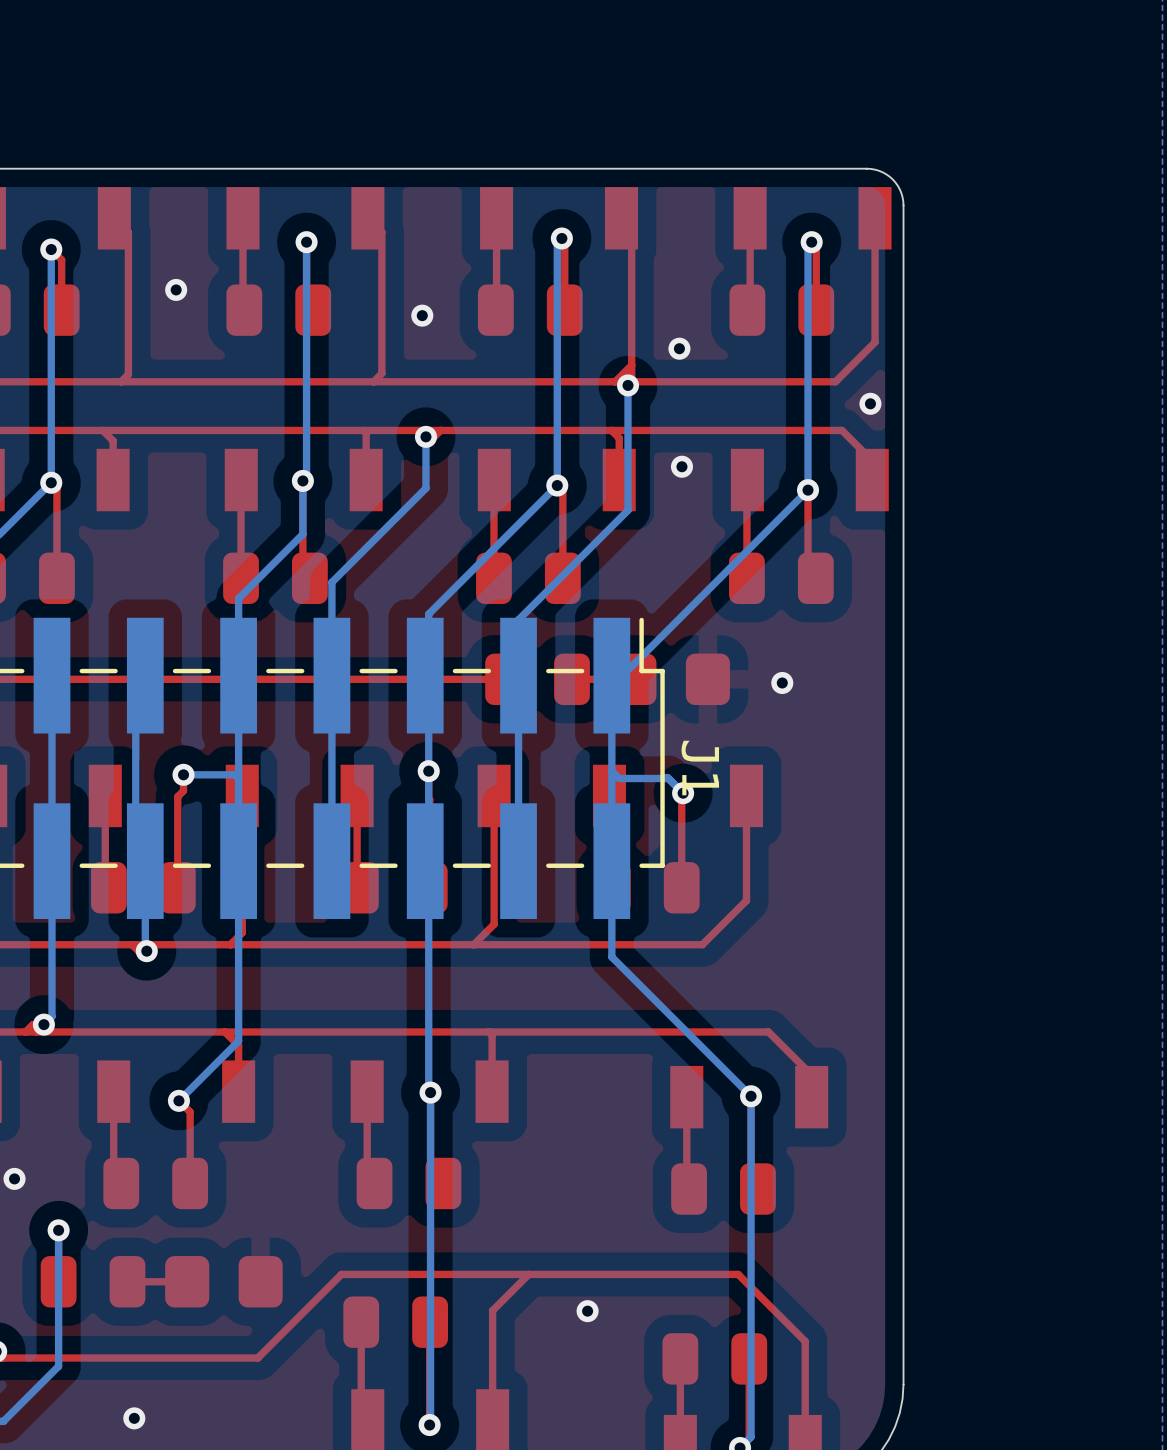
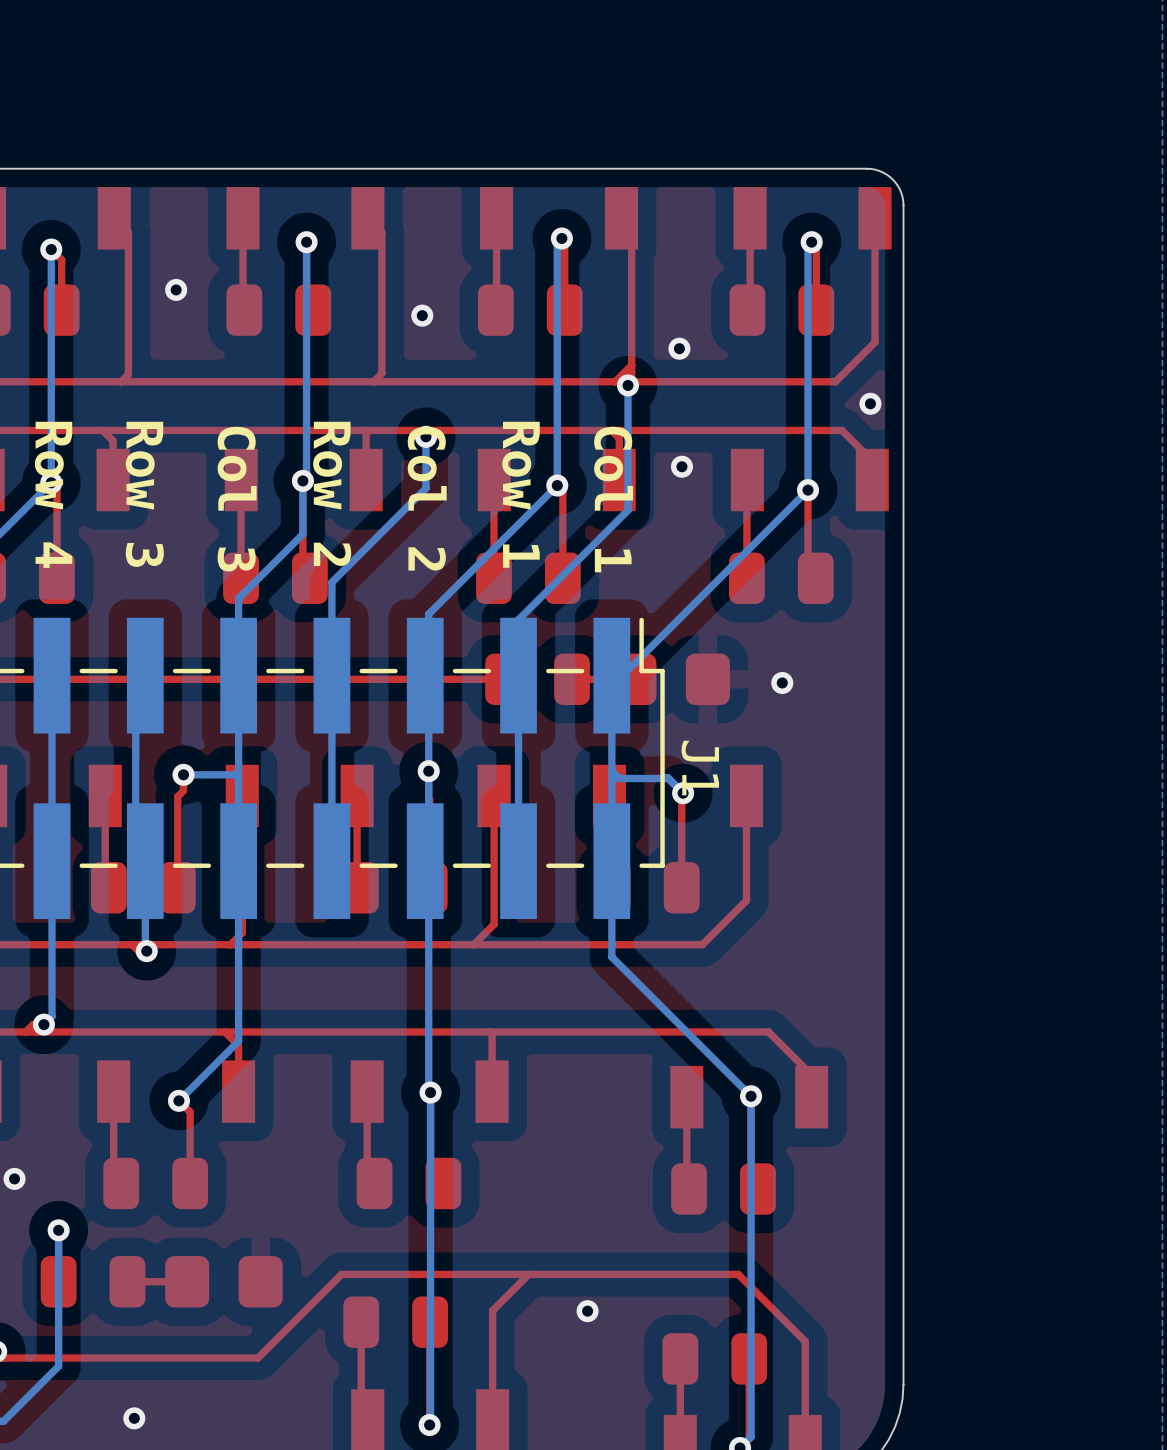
text: none -> Row 2 (332, 493)
text: none -> Row 4 (53, 494)
text: none -> Row 3 (144, 494)
text: none -> Row 1 (521, 494)
text: none -> Col 2 (427, 498)
text: none -> Col 3 (237, 499)
text: none -> Col 1 (613, 499)

